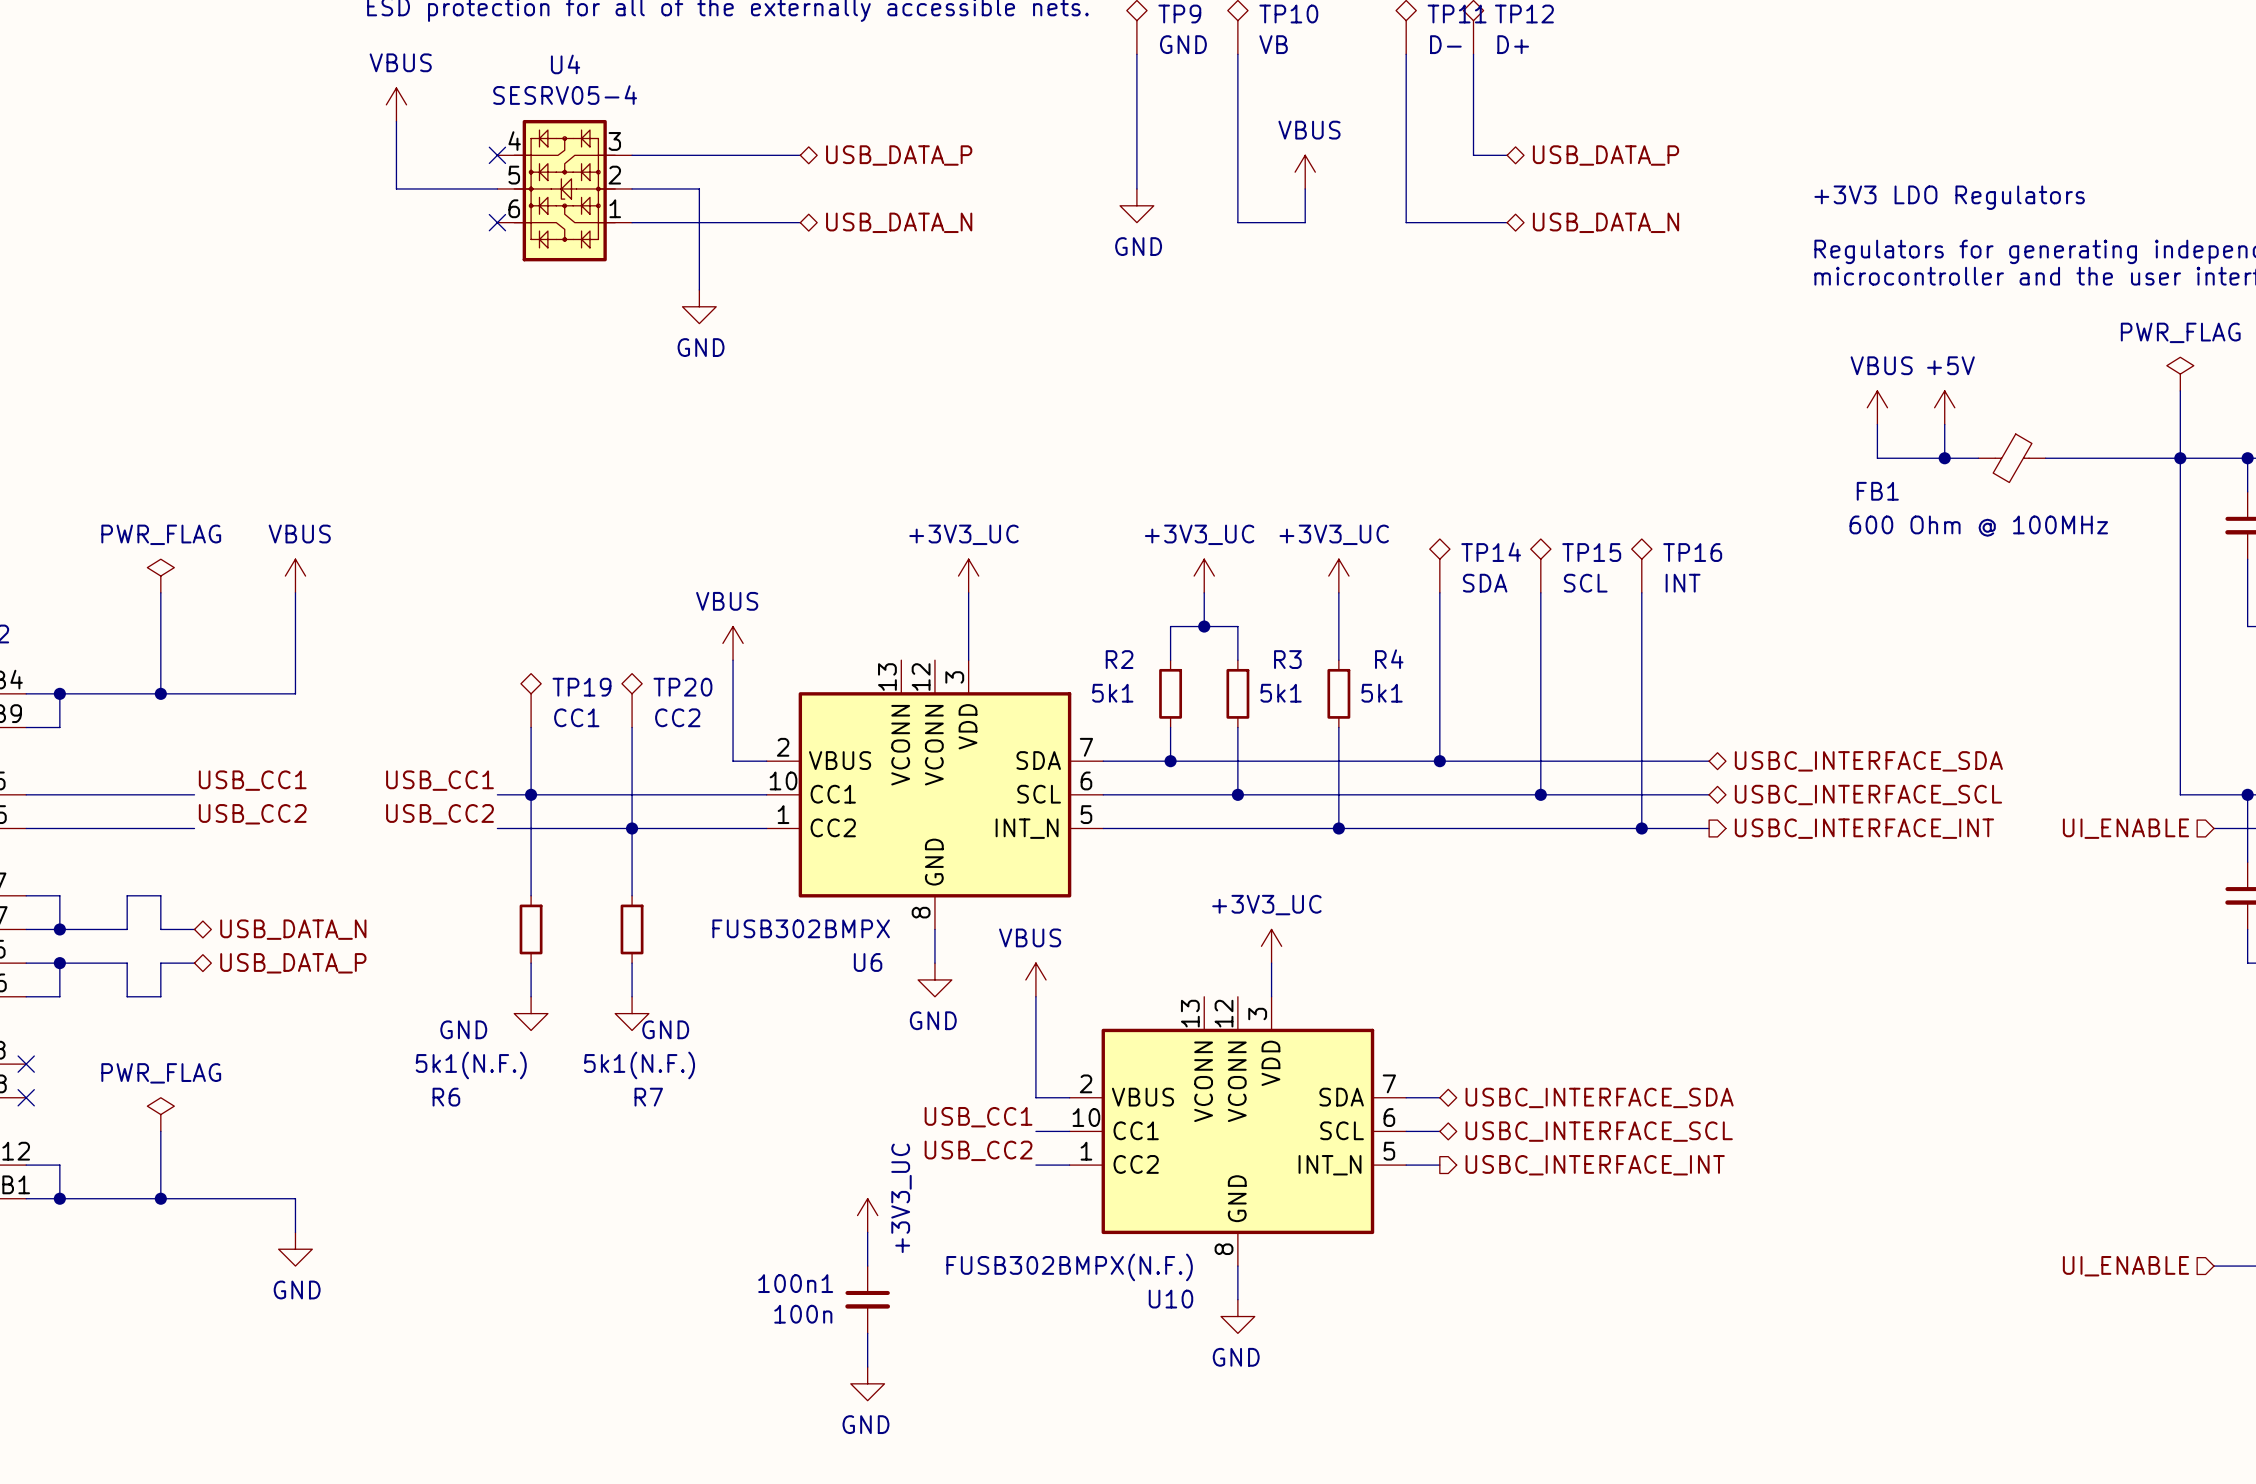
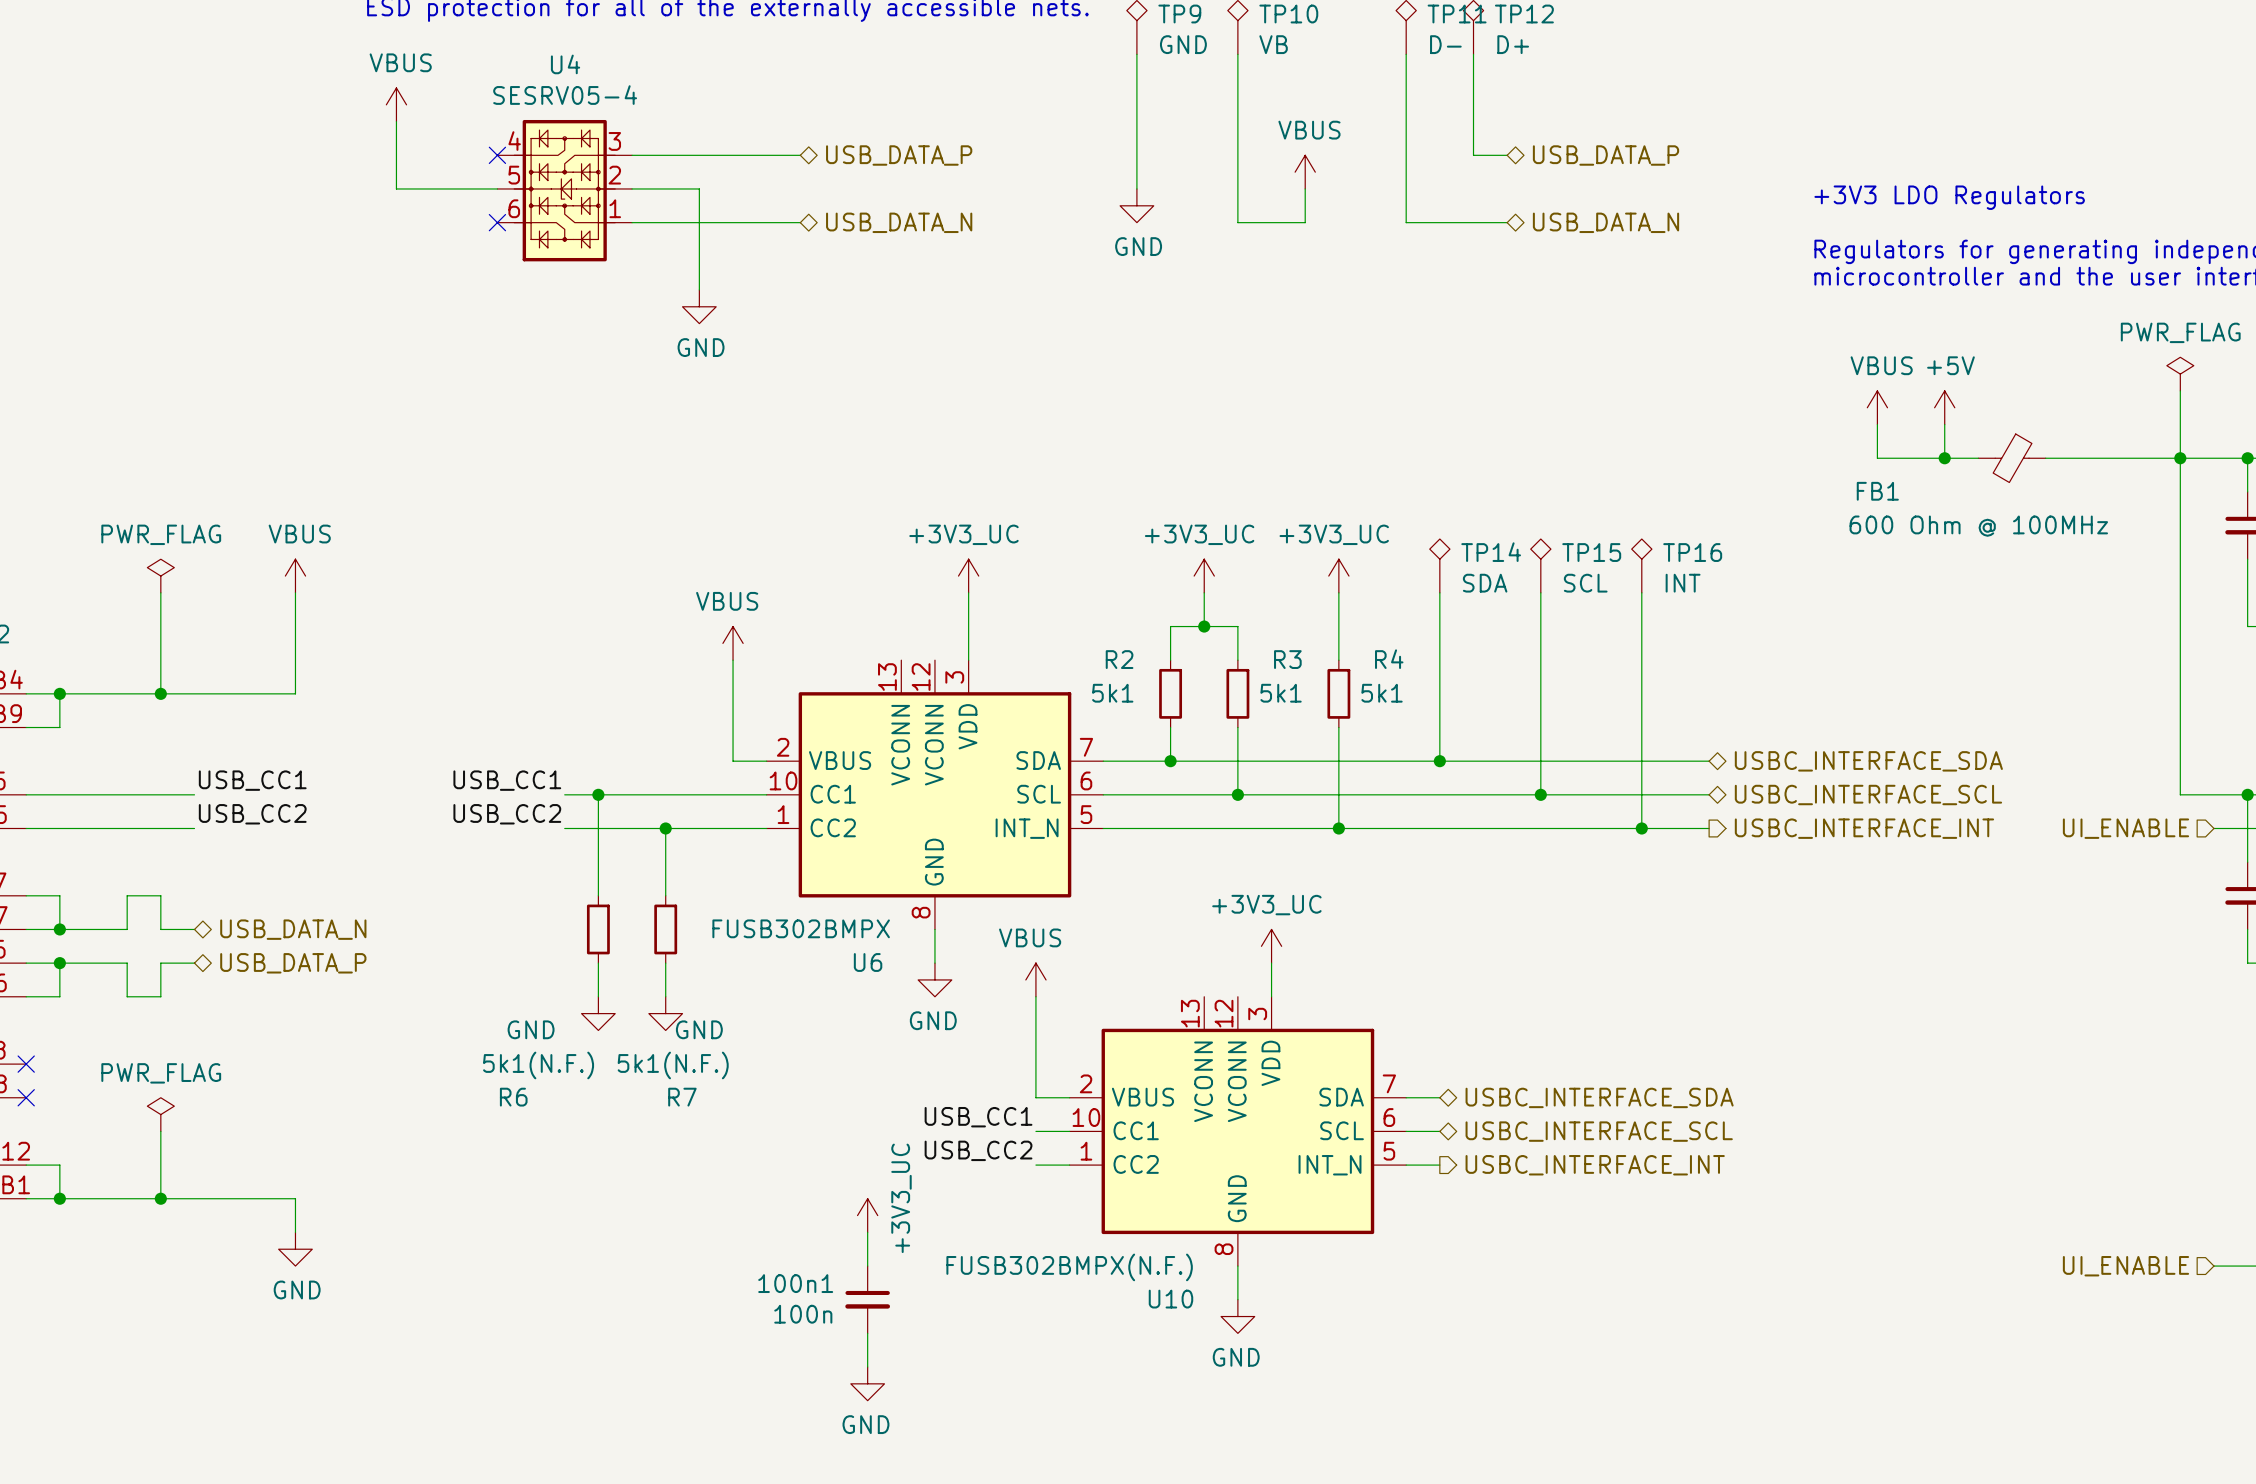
TP19: CC1 (531, 700) -> none
TP20: CC2 (632, 700) -> none
wire: (531, 727) (531, 895) -> none
wire: (632, 727) (632, 895) -> none
label position: USB_CC1 (439, 780) -> USB_CC1 (507, 780)
wire: (497, 794) (564, 794) -> none
junction: (531, 794) -> none
wire: none -> (598, 794) (598, 895)
junction: none -> (598, 794)
label position: USB_CC2 (439, 814) -> USB_CC2 (507, 814)
wire: (497, 828) (564, 828) -> none
junction: (632, 828) -> none
wire: none -> (665, 828) (665, 895)
junction: none -> (665, 828)
R6 position: (531, 929) -> (598, 929)
R7 position: (632, 929) -> (665, 929)
wire: (531, 963) (531, 996) -> (665, 963) (665, 996)
wire: (632, 963) (632, 996) -> (598, 963) (598, 996)
power symbol: GND (531, 1013) -> none
power symbol: none -> GND (598, 1013)
power symbol: GND (632, 1013) -> none
power symbol: none -> GND (665, 1013)

